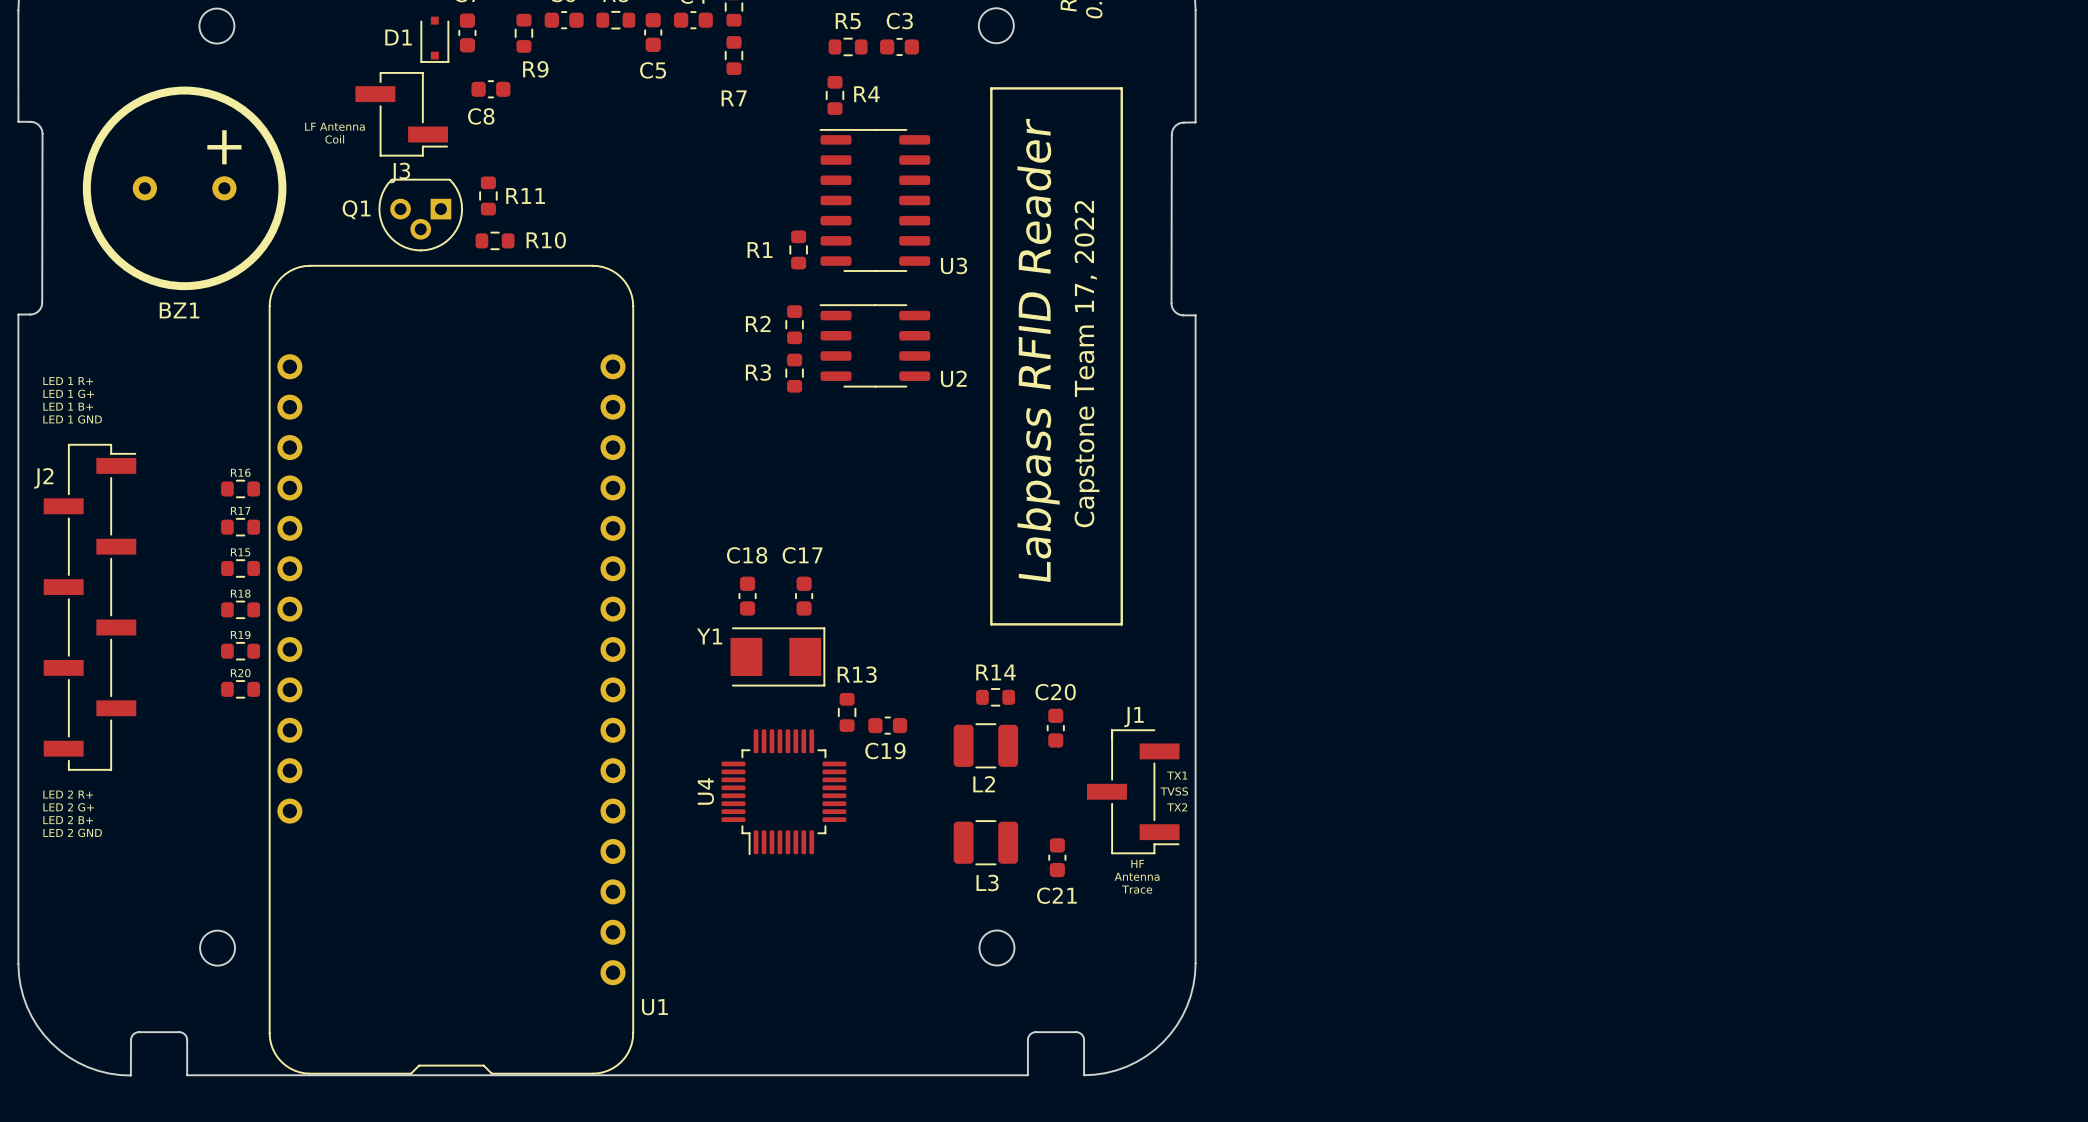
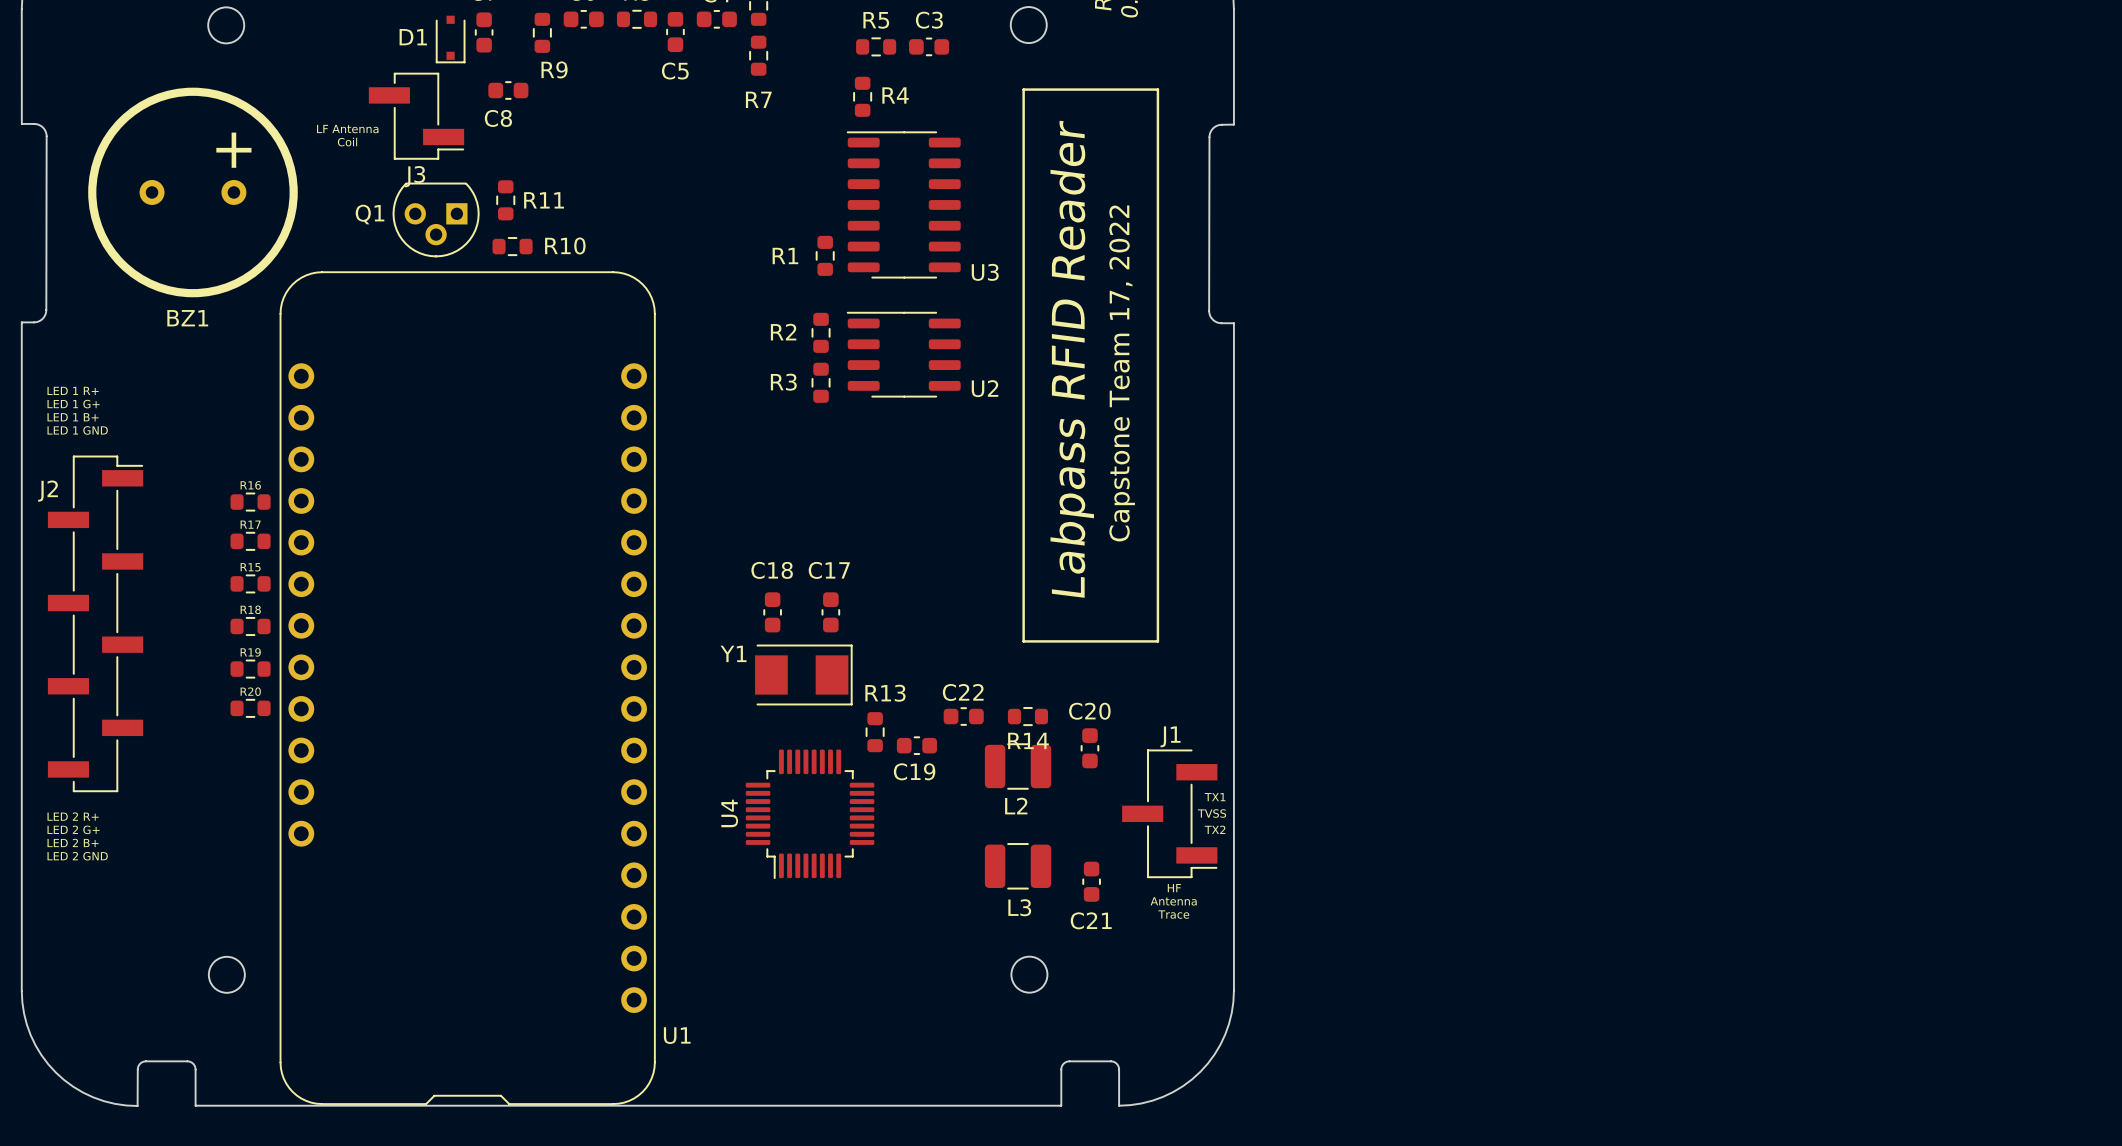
R14 name position: R14 (996, 672) -> R14 (1028, 740)
C22: none -> (963, 716)

